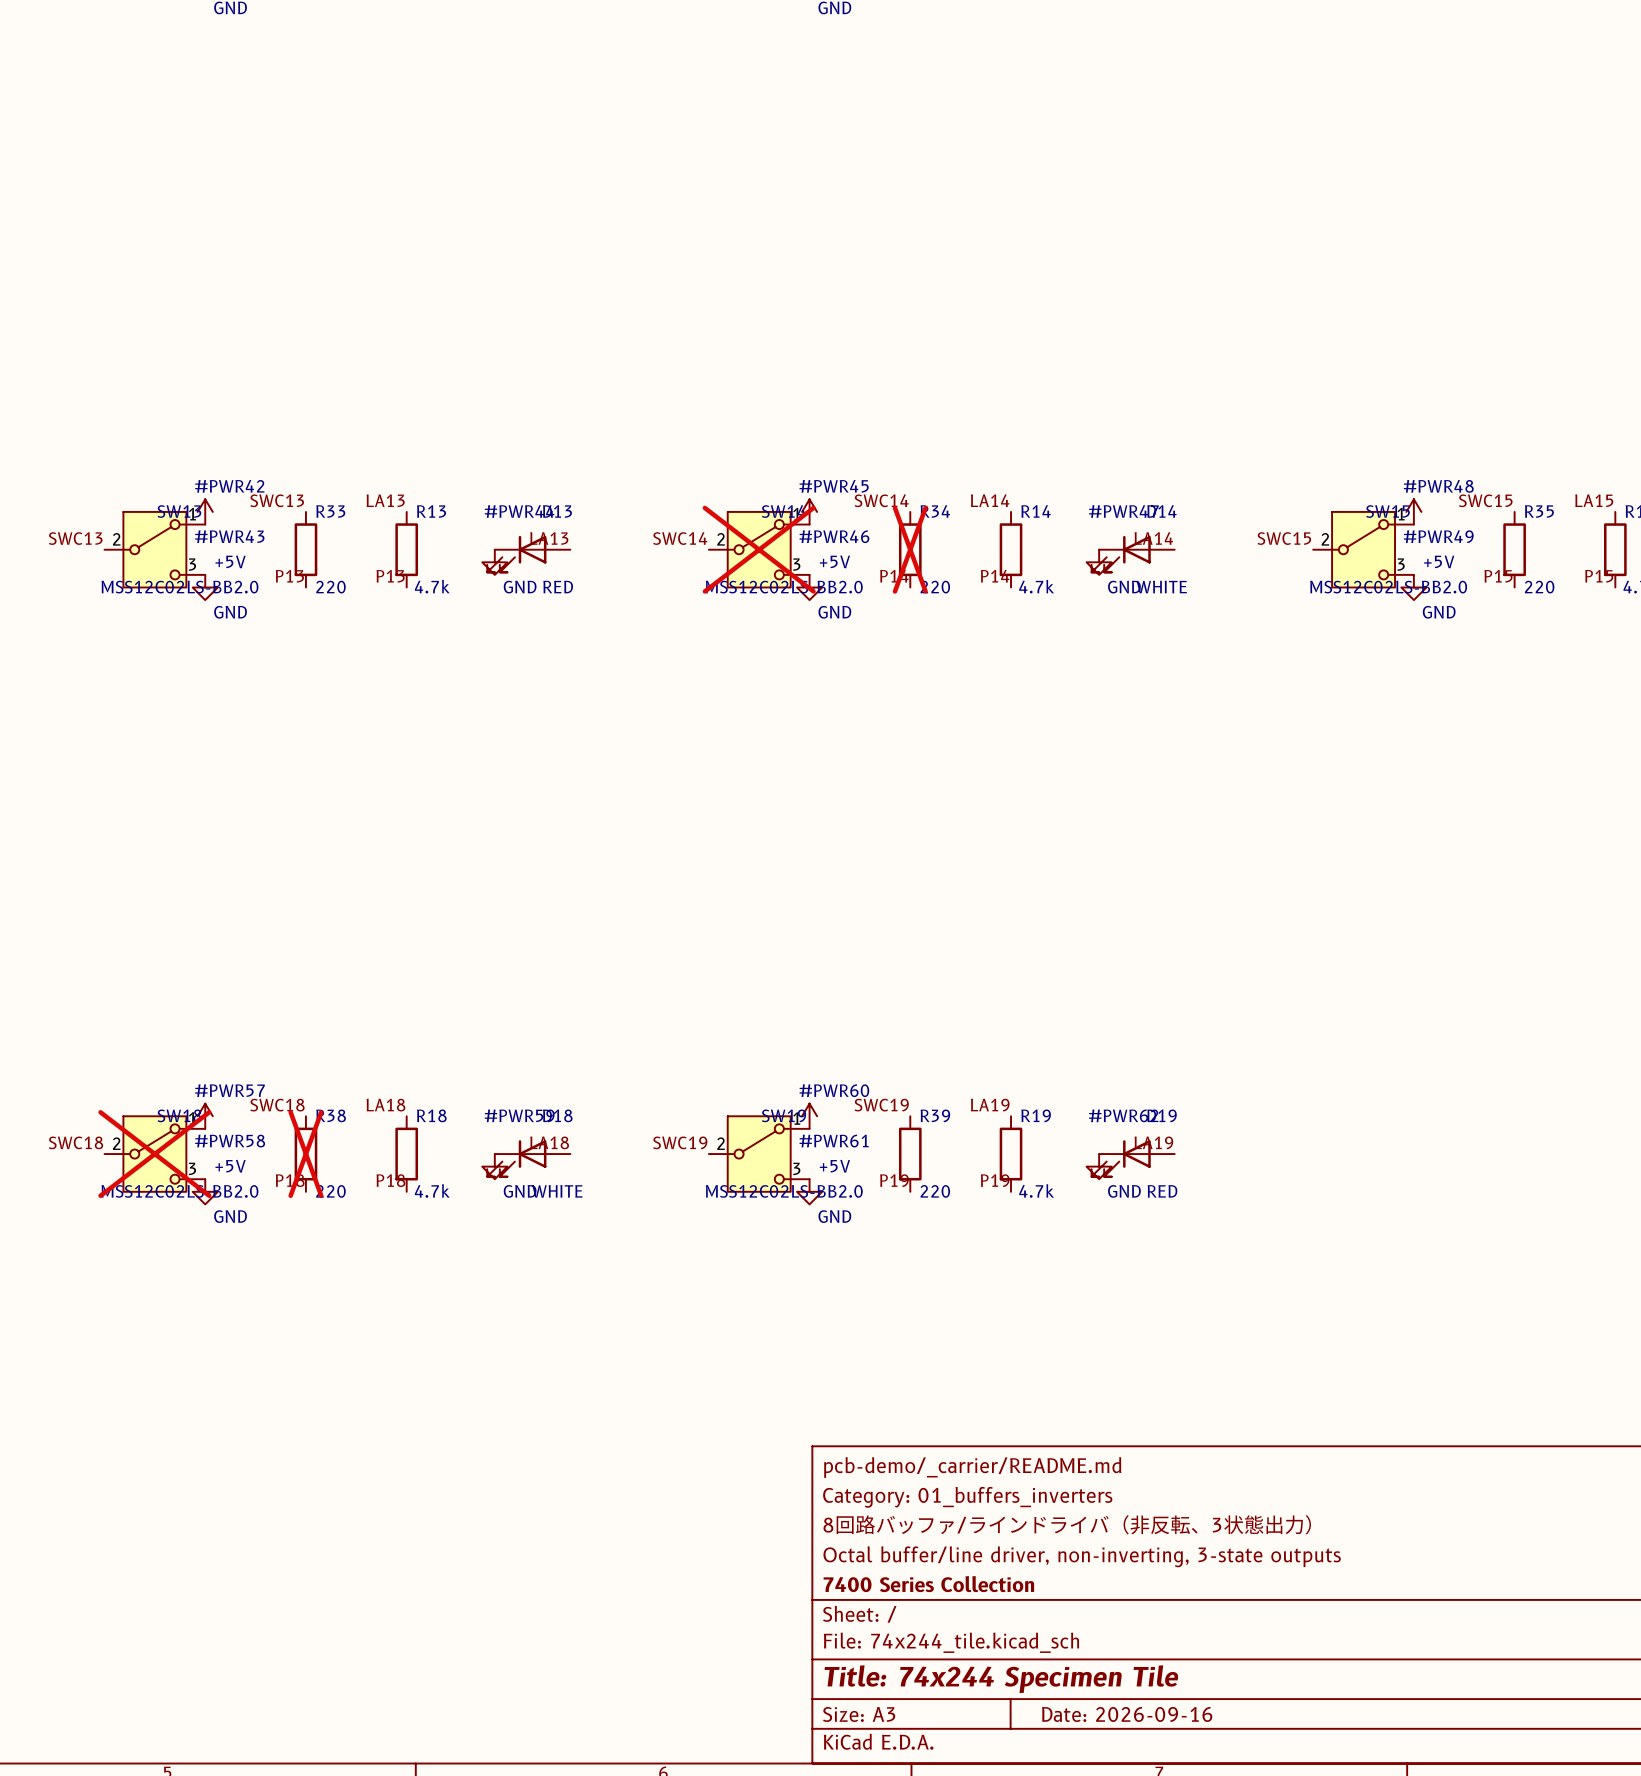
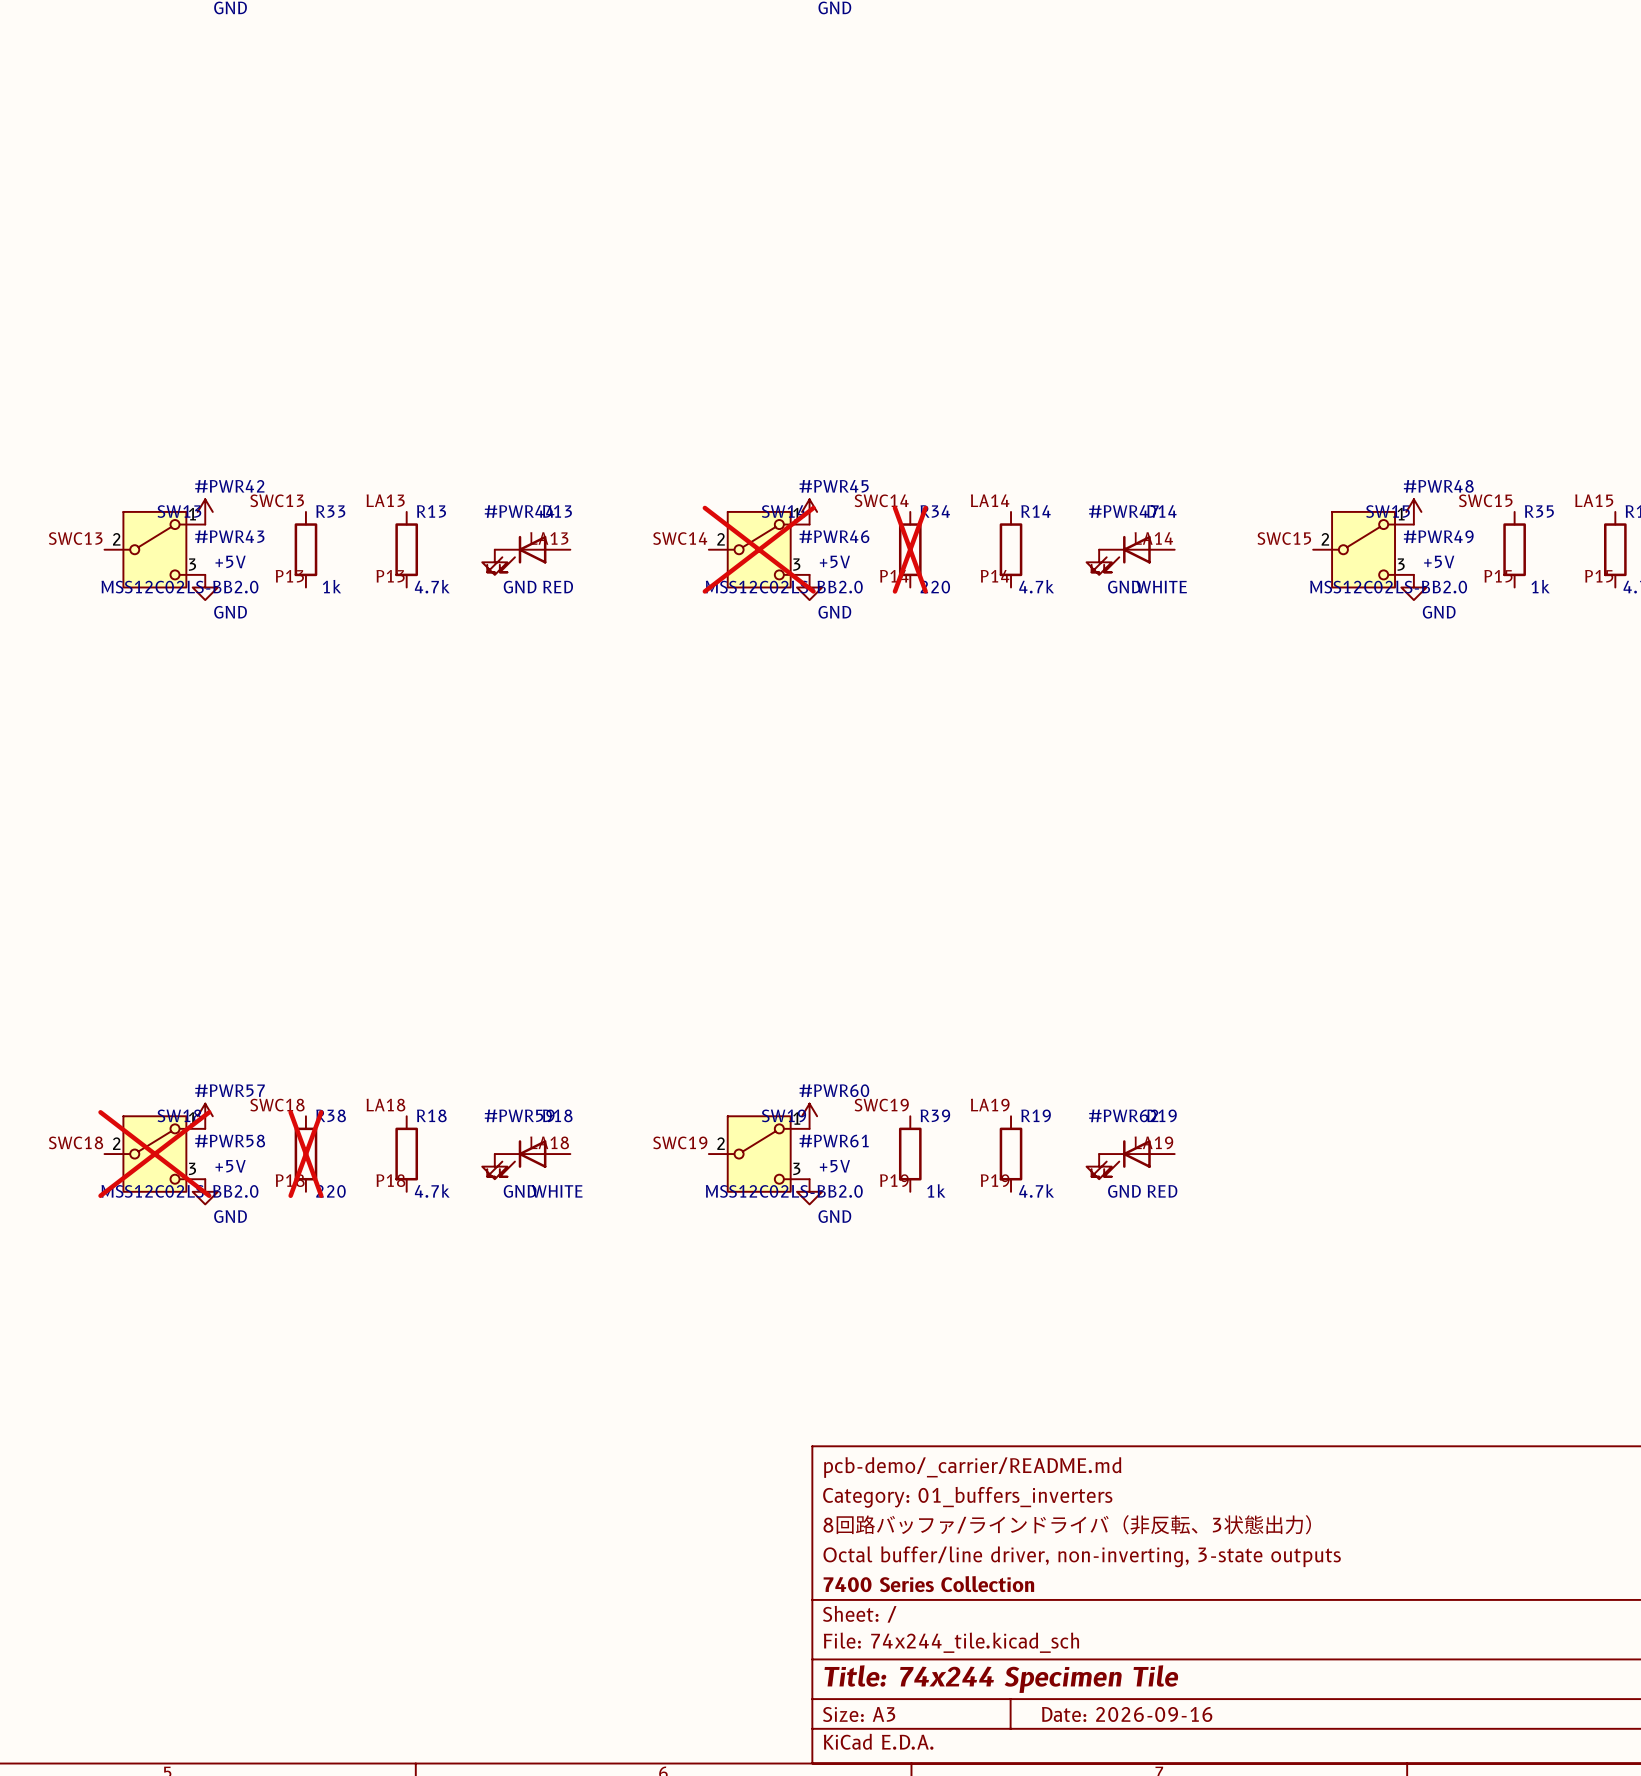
R33 value: 220 (330, 587) -> 1k (331, 586)
R35 value: 220 (1539, 587) -> 1k (1540, 586)
R39 value: 220 (935, 1191) -> 1k (936, 1190)

